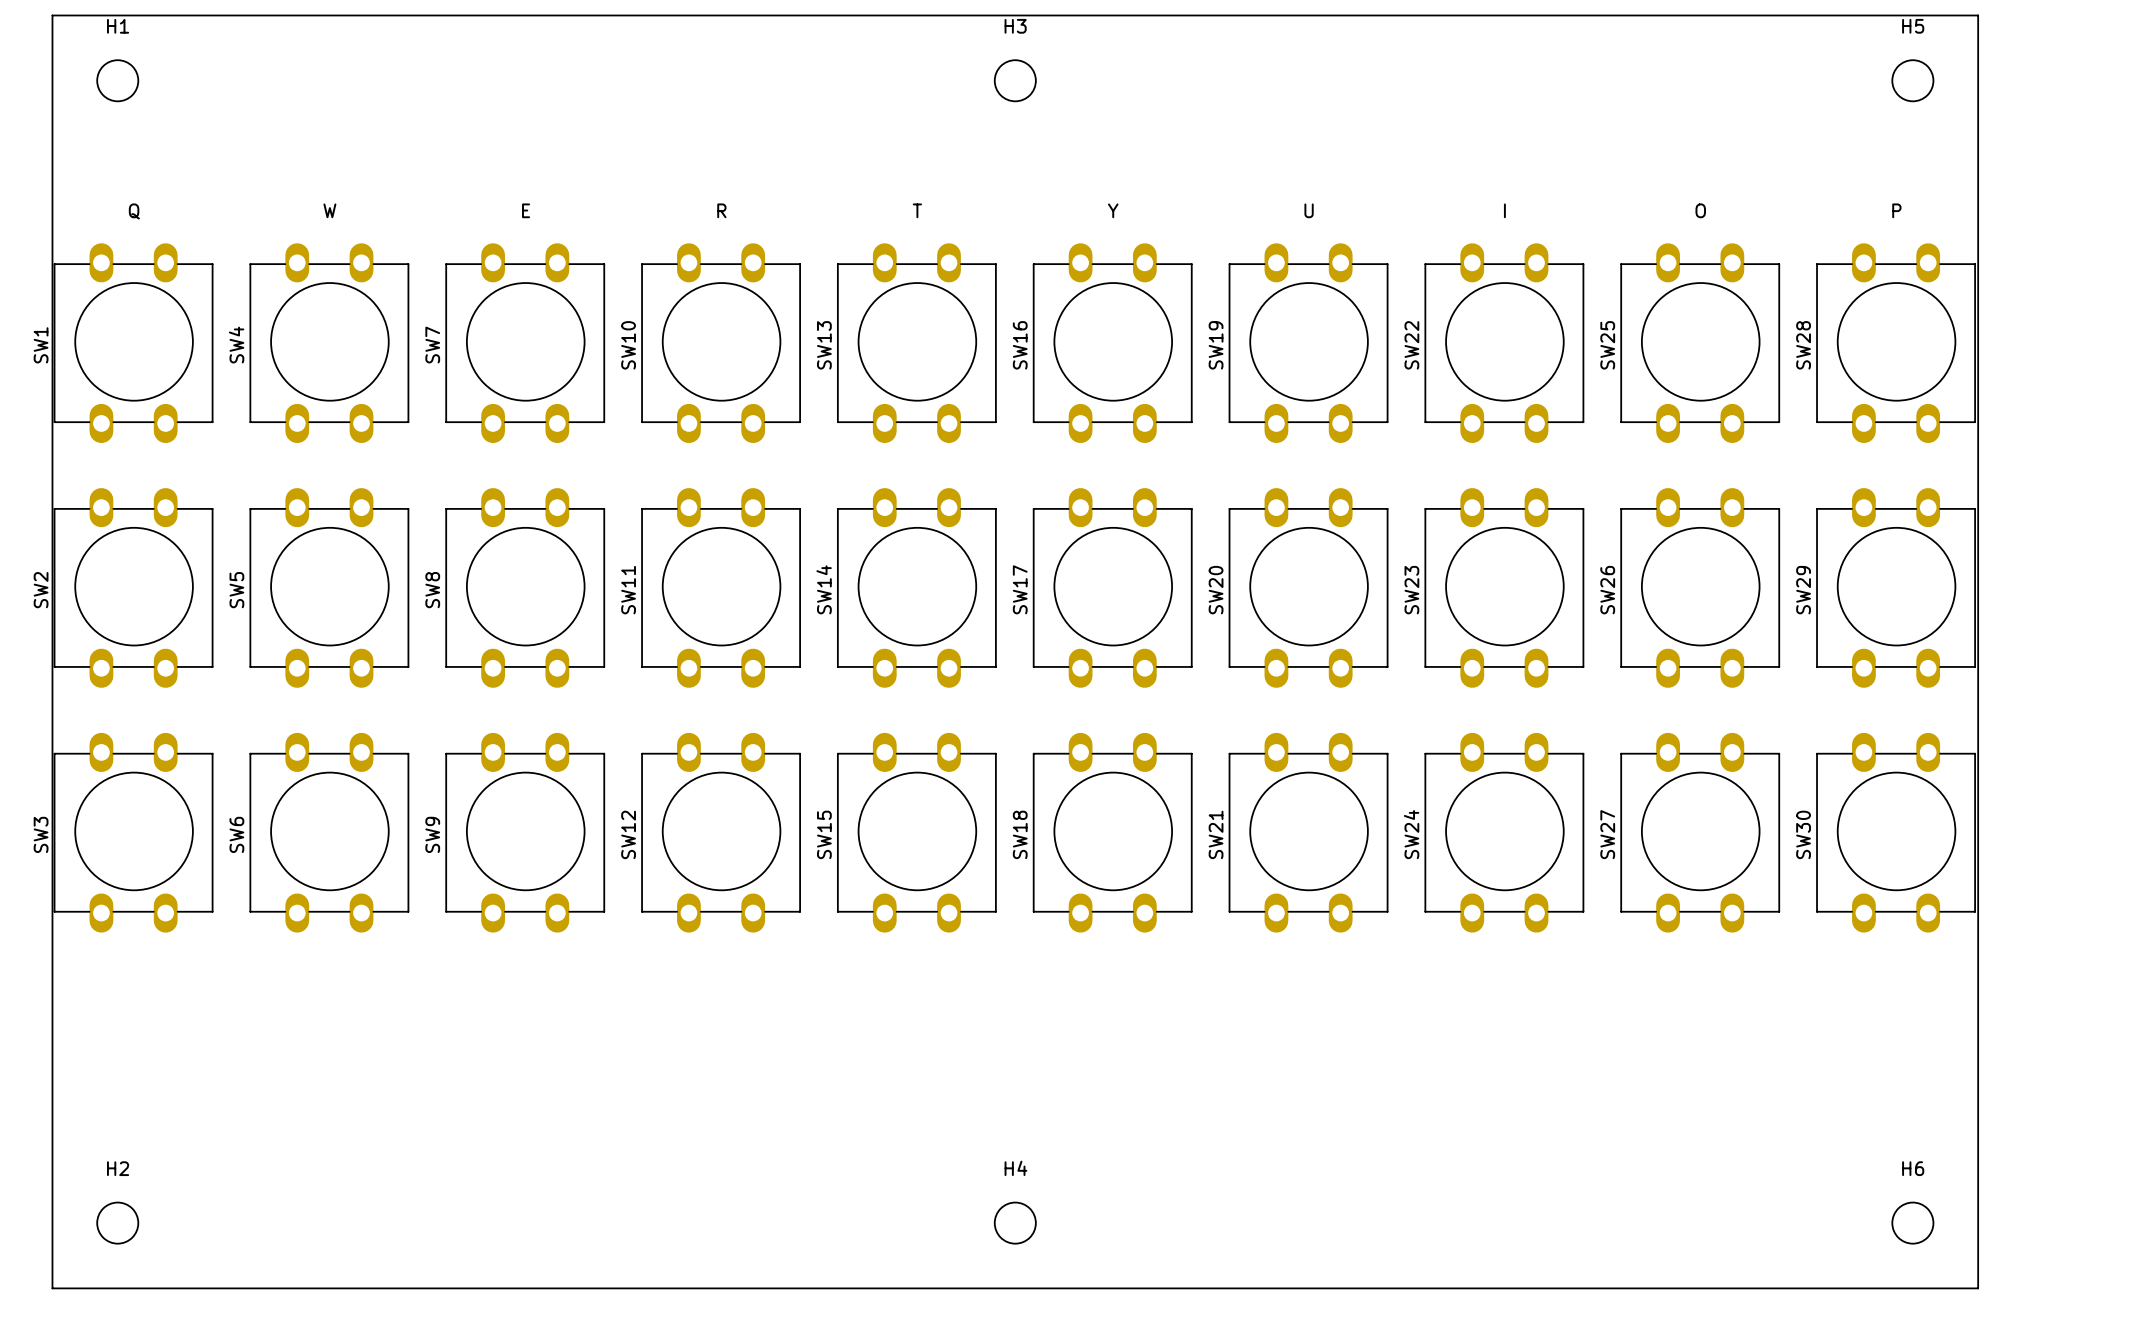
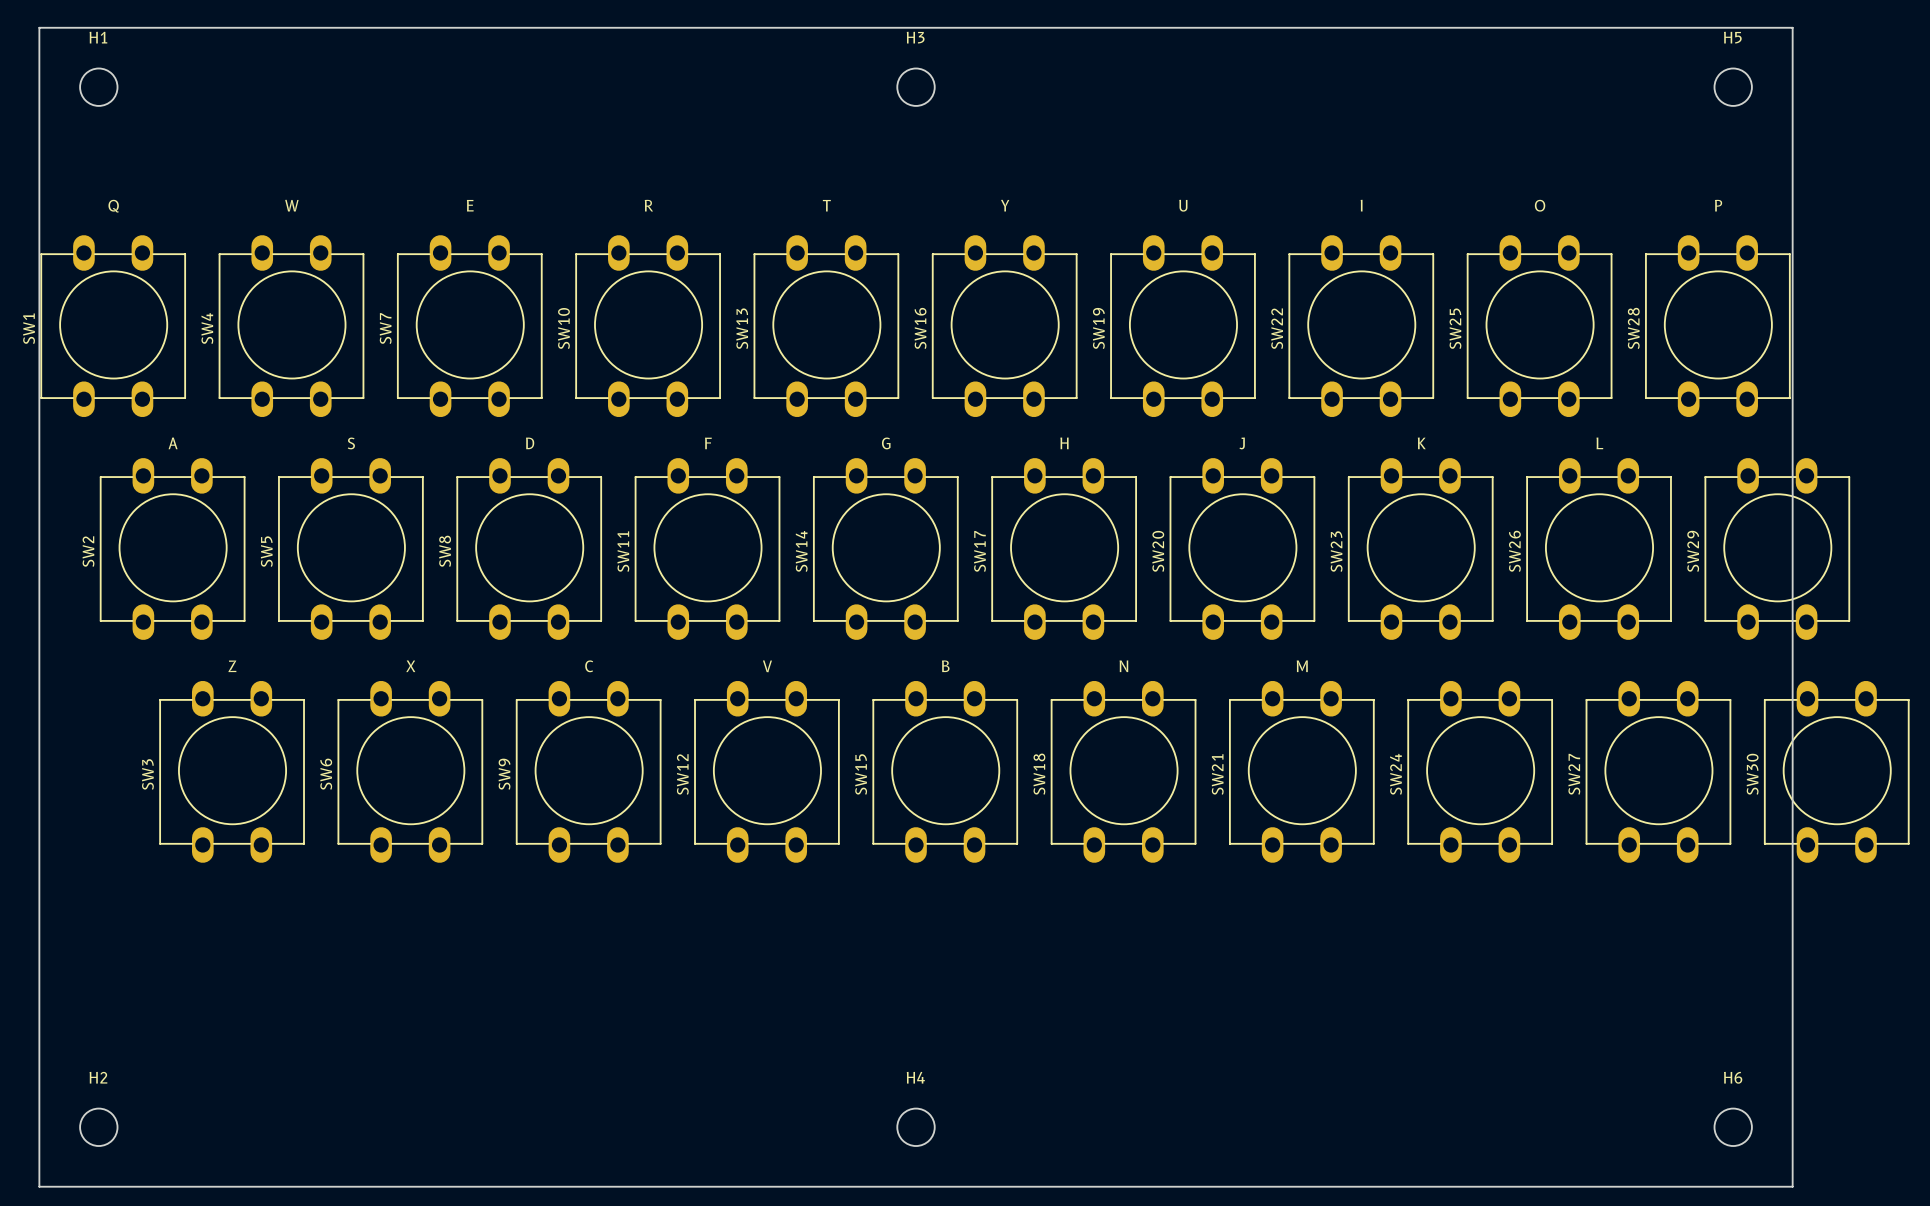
text: none -> A (173, 443)
text: none -> S (351, 443)
text: none -> D (530, 443)
text: none -> F (708, 443)
text: none -> G (886, 443)
text: none -> H (1064, 443)
text: none -> J (1242, 443)
text: none -> K (1421, 443)
text: none -> L (1599, 443)
SW2 position: (133, 587) -> (172, 548)
SW5 position: (329, 587) -> (350, 548)
SW8 position: (525, 587) -> (529, 548)
SW11 position: (721, 587) -> (707, 548)
SW14 position: (916, 587) -> (885, 548)
SW17 position: (1112, 587) -> (1064, 548)
SW20 position: (1308, 587) -> (1242, 548)
SW23 position: (1504, 587) -> (1420, 548)
SW26 position: (1700, 587) -> (1599, 548)
SW29 position: (1896, 587) -> (1777, 548)
text: none -> Z (232, 666)
text: none -> X (410, 666)
text: none -> C (589, 666)
text: none -> V (767, 666)
text: none -> B (945, 666)
text: none -> N (1123, 666)
text: none -> M (1302, 666)
SW3 position: (133, 832) -> (232, 771)
SW6 position: (329, 832) -> (410, 771)
SW9 position: (525, 832) -> (588, 771)
SW12 position: (721, 832) -> (766, 771)
SW15 position: (916, 832) -> (945, 771)
SW18 position: (1112, 832) -> (1123, 771)
SW21 position: (1308, 832) -> (1301, 771)
SW24 position: (1504, 832) -> (1480, 771)
SW27 position: (1700, 832) -> (1658, 771)
SW30 position: (1896, 832) -> (1836, 771)

